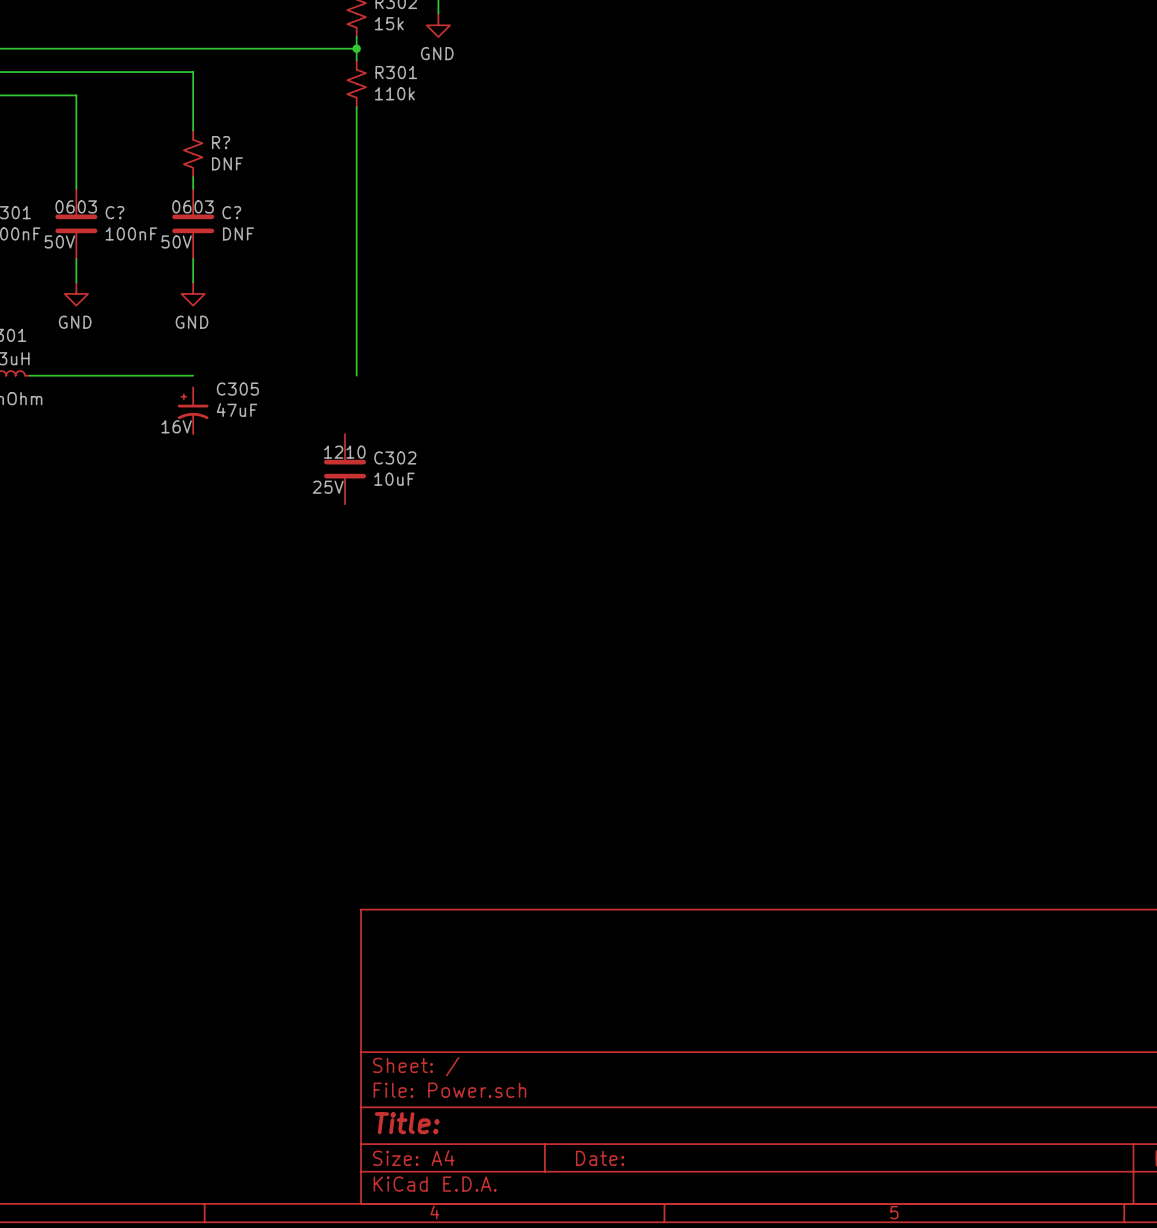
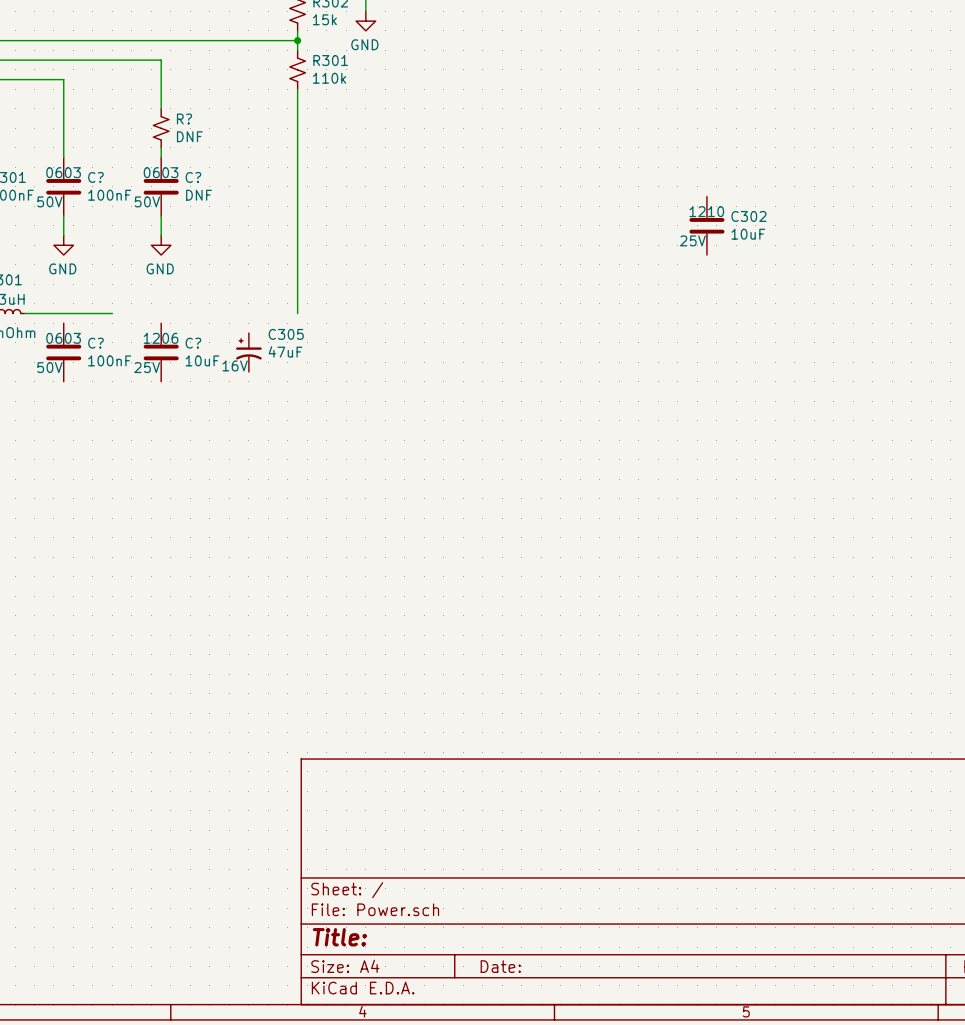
wire: (134, 375) (193, 375) -> none
C305 position: (193, 410) -> (248, 352)
C?: none -> 100nF (63, 352)
C?: none -> 10uF (161, 352)
C302 position: (344, 469) -> (706, 225)

